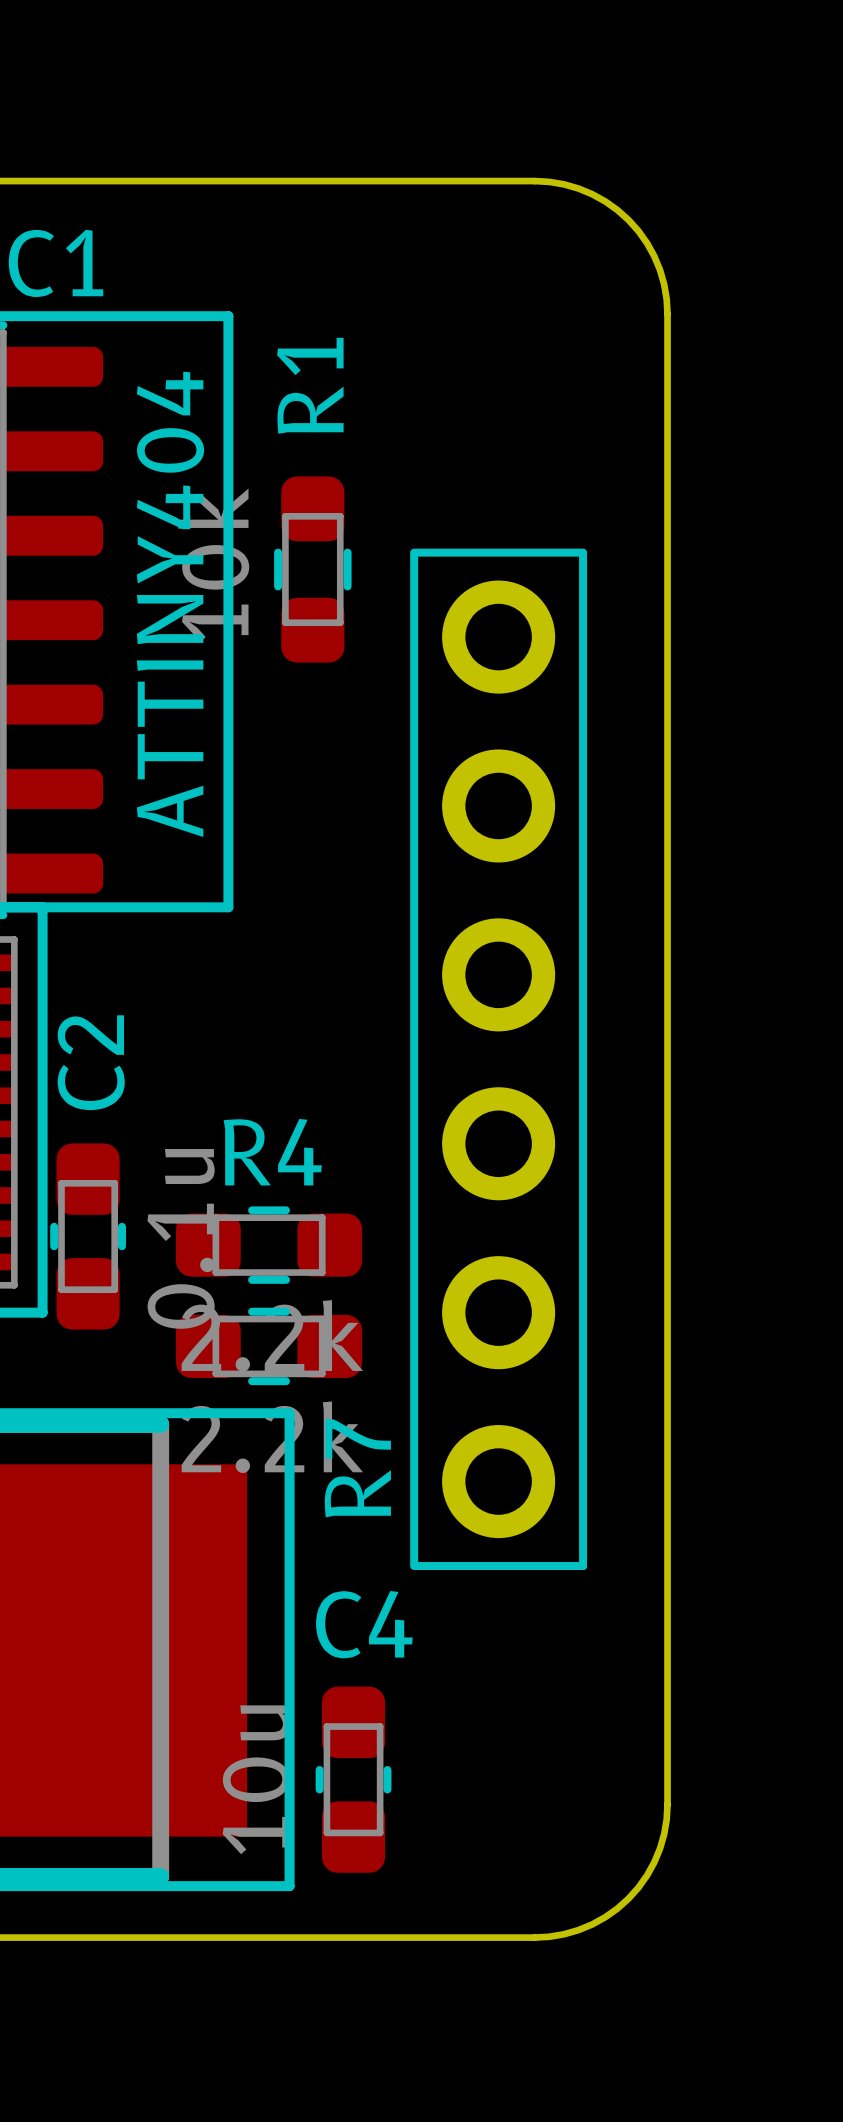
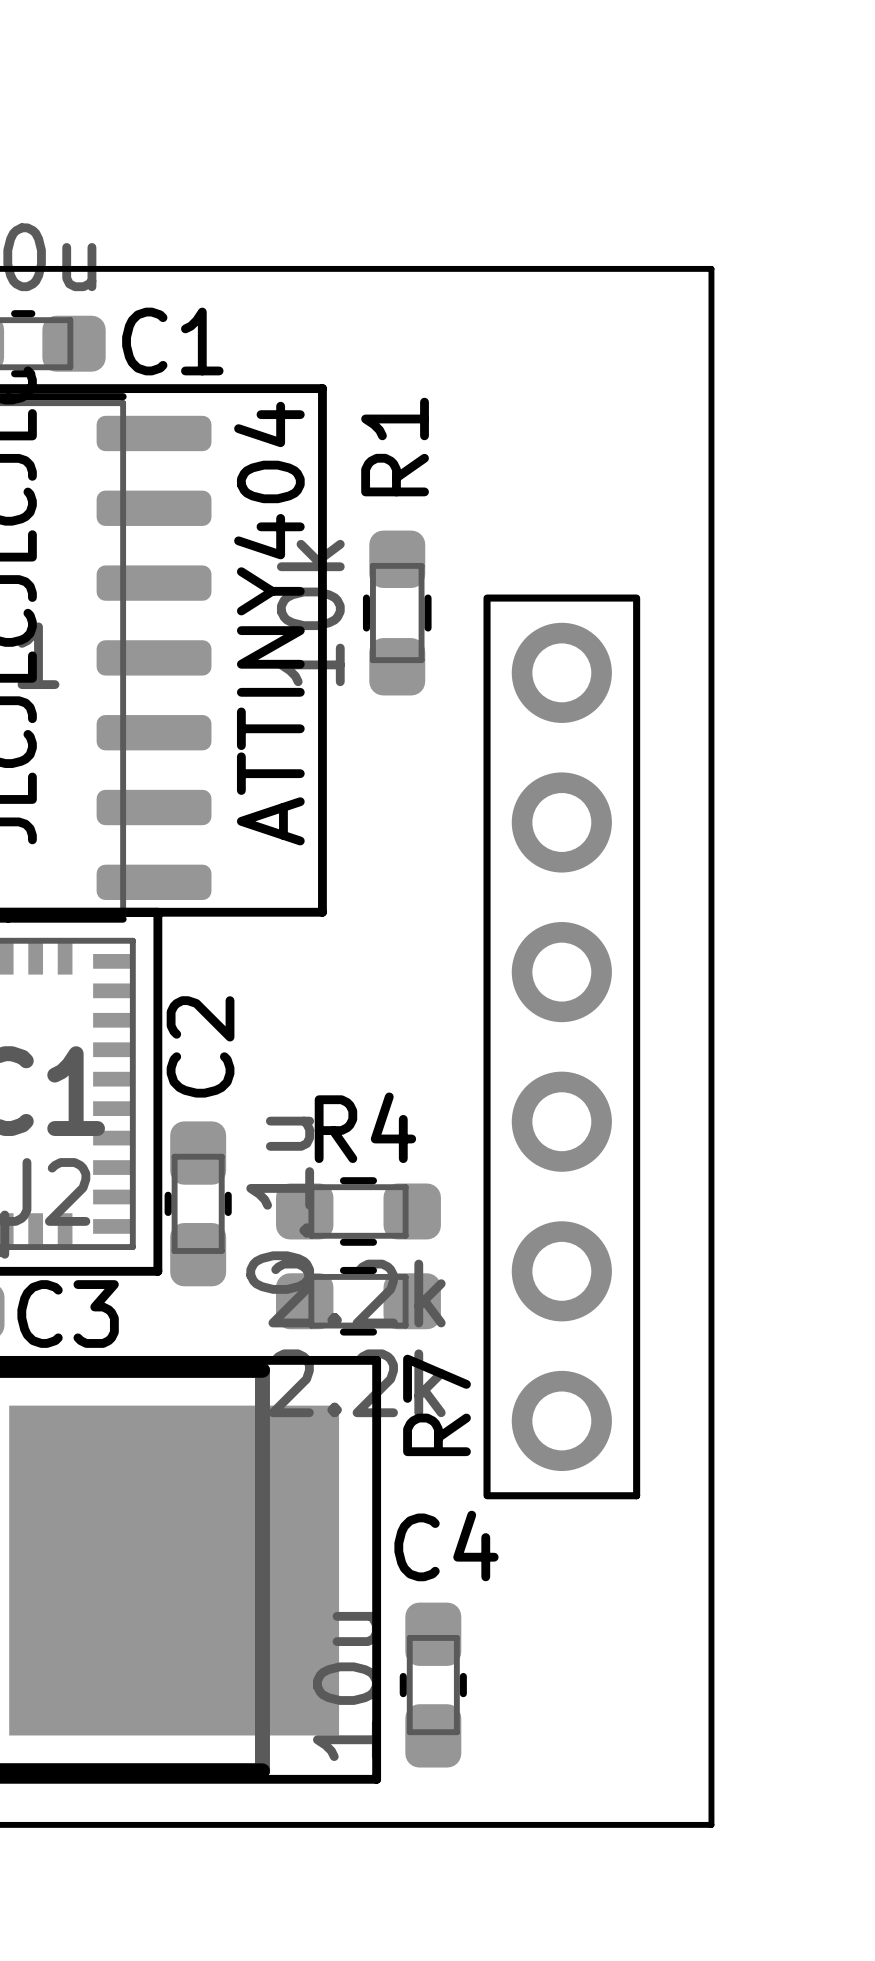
board edge: (534, 181) (564, 184) (578, 188) (605, 201) (628, 220) (647, 243) (654, 256) (664, 284) (667, 314) -> (593, 268) (711, 268) (711, 386)
board edge: (667, 1804) (664, 1834) (654, 1862) (647, 1875) (628, 1898) (605, 1917) (578, 1930) (549, 1936) (534, 1937) -> (711, 1707) (711, 1824) (593, 1824)

